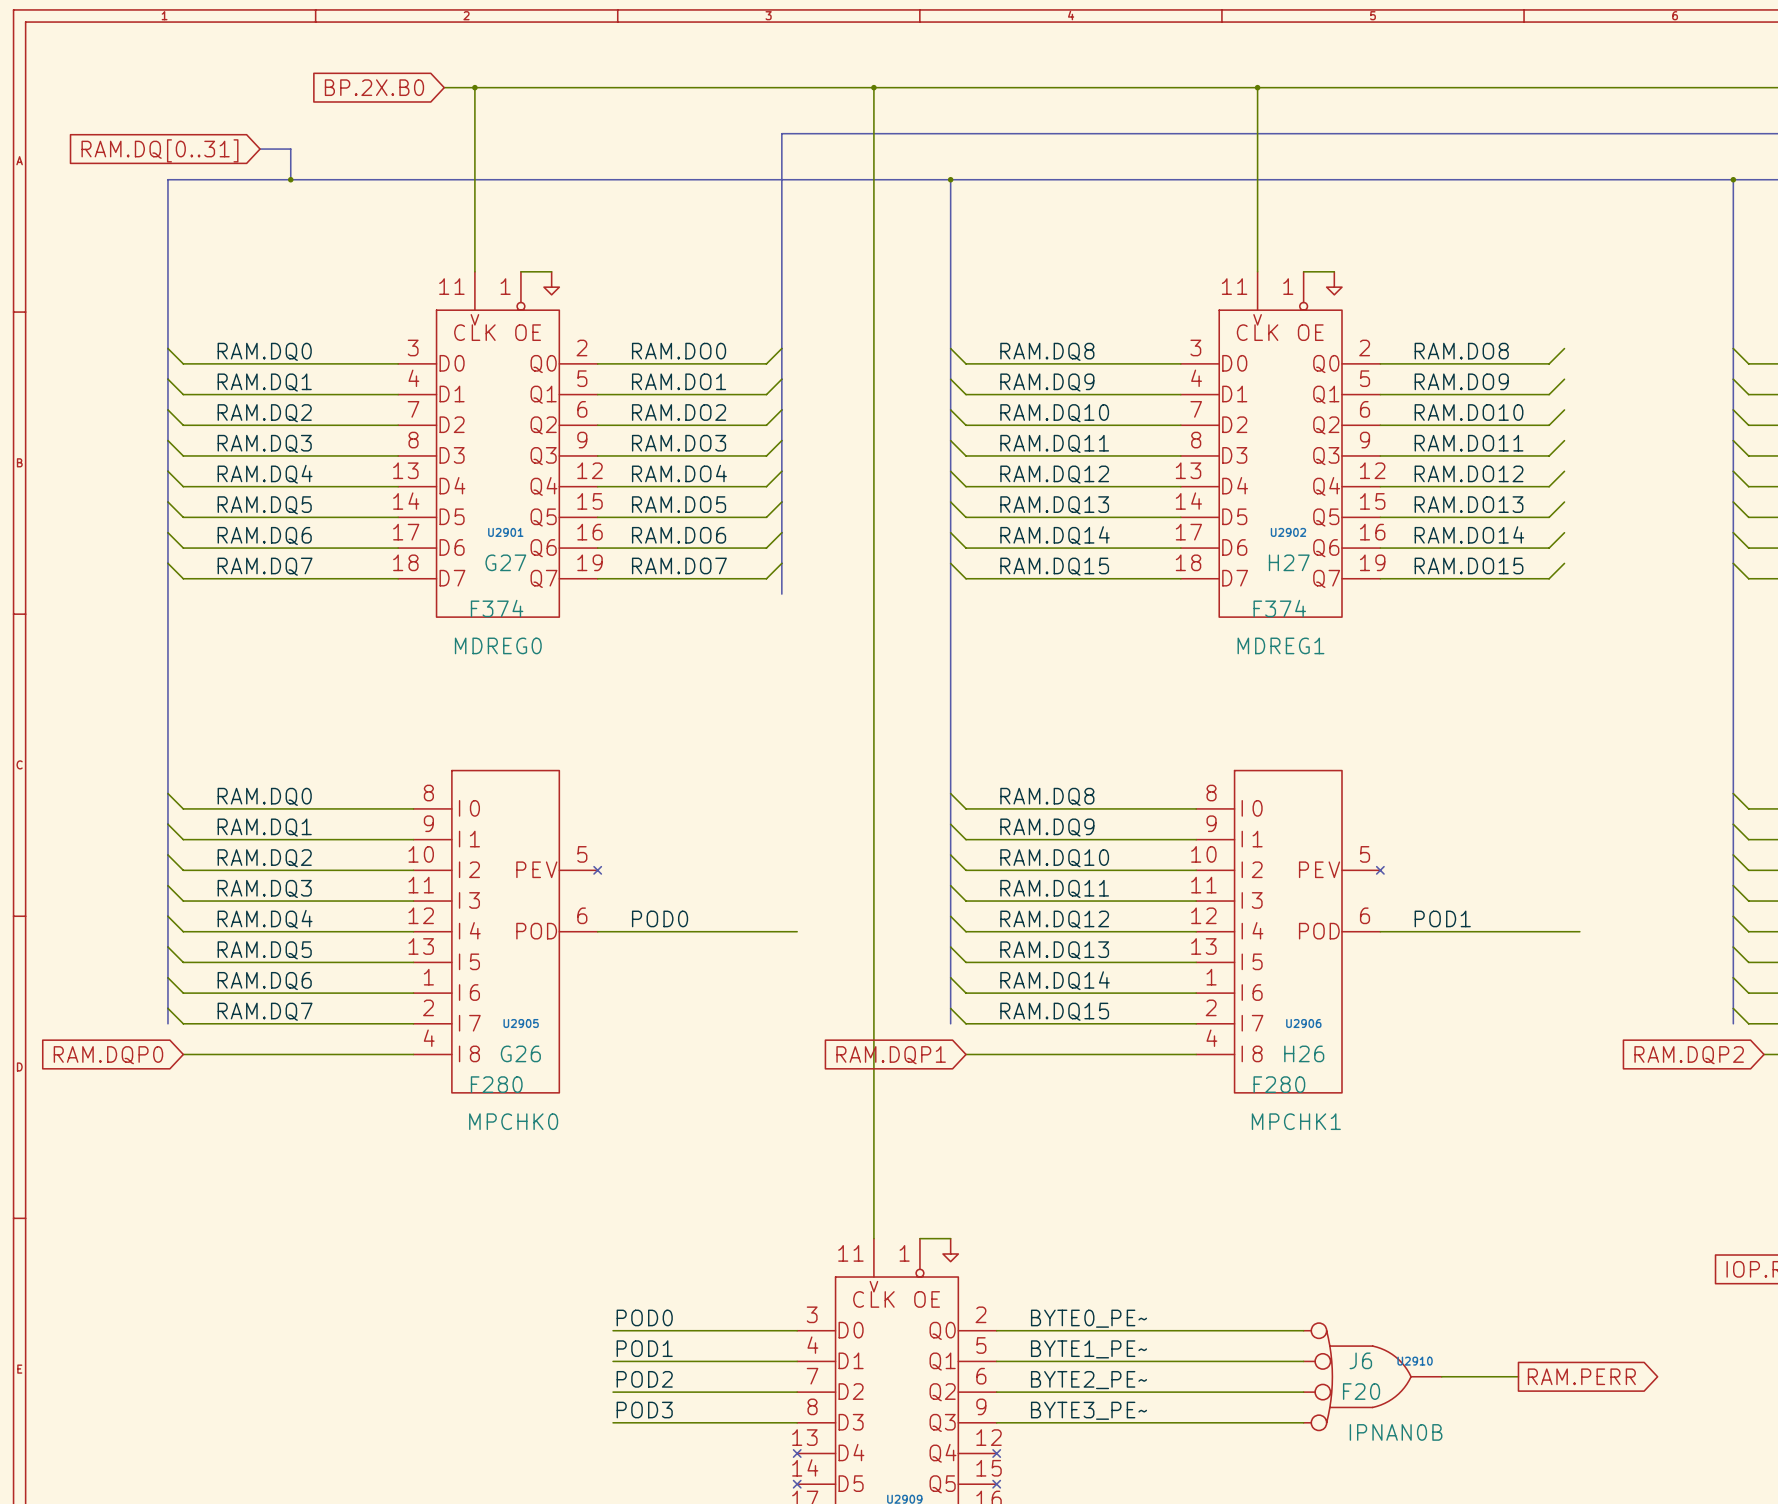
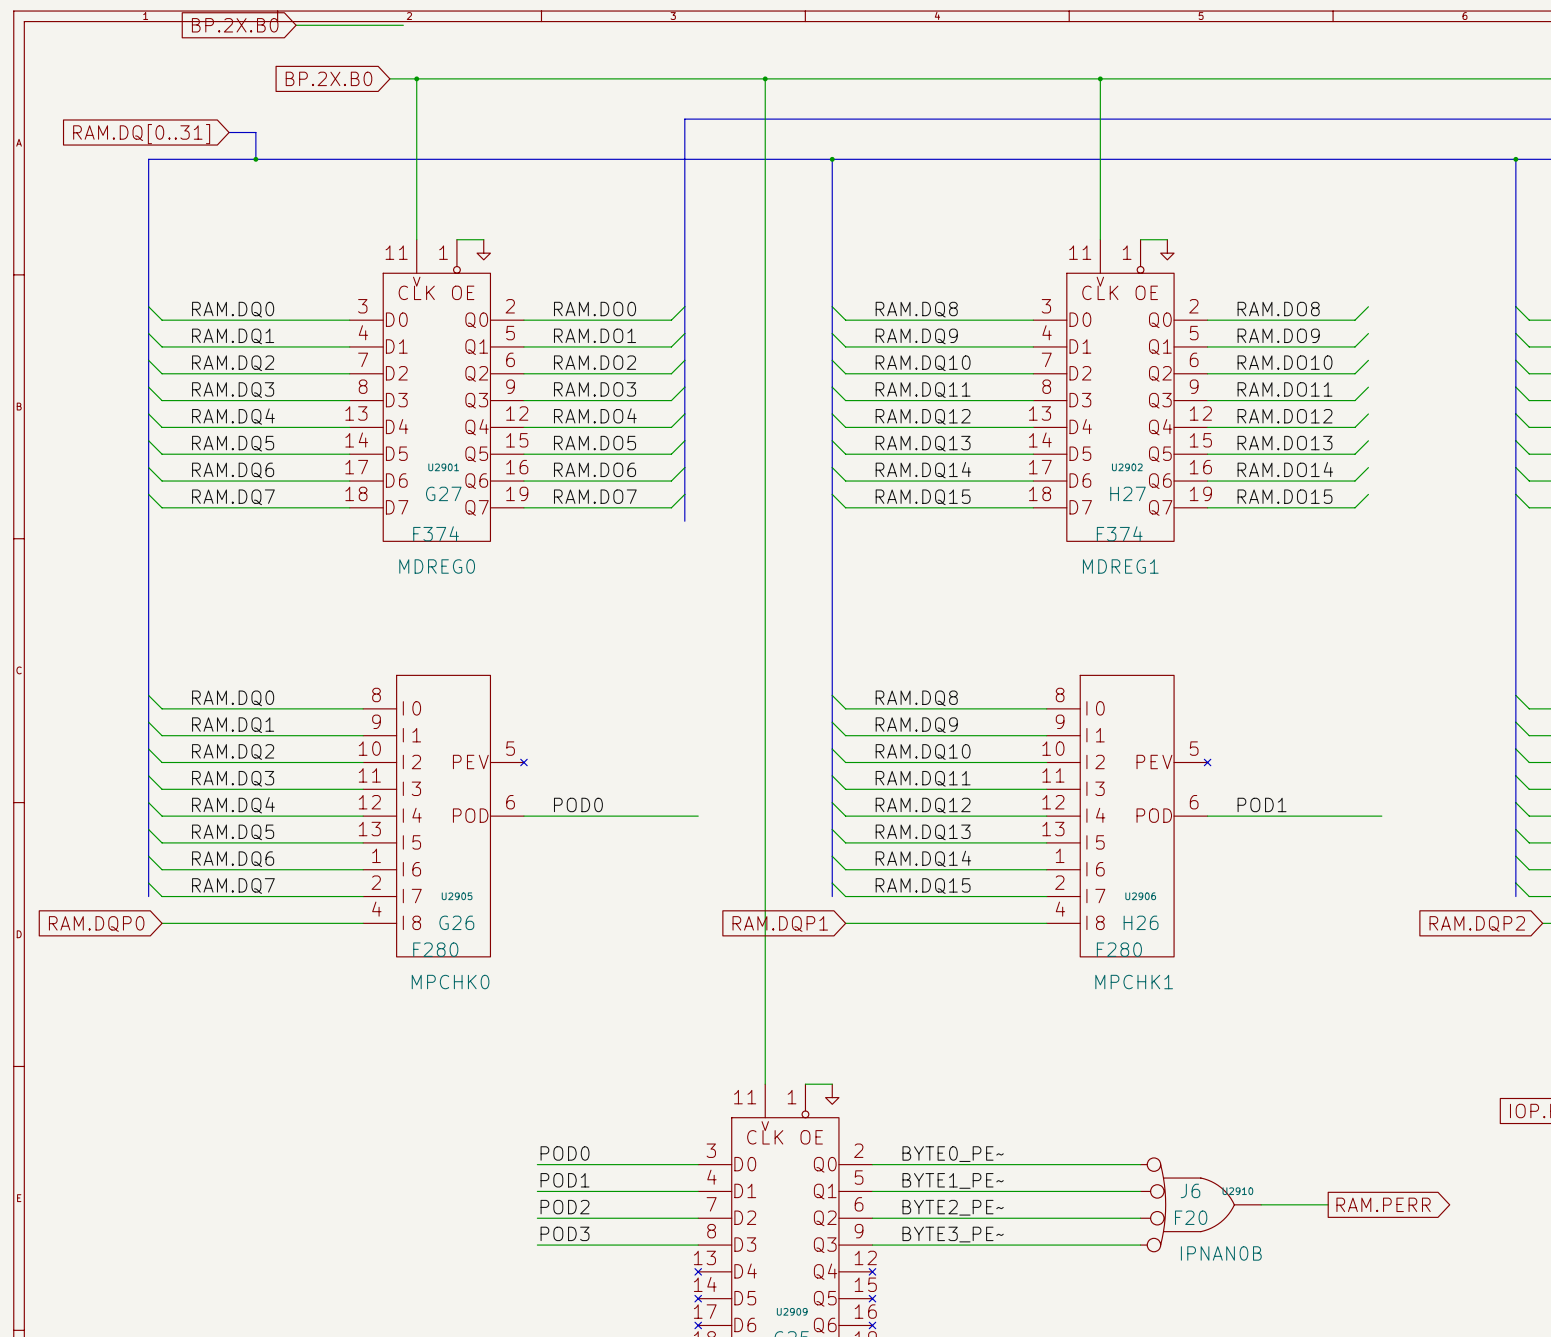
global label: none -> BP.2X.B0 (235, 25)
wire: none -> (296, 25) (403, 25)

